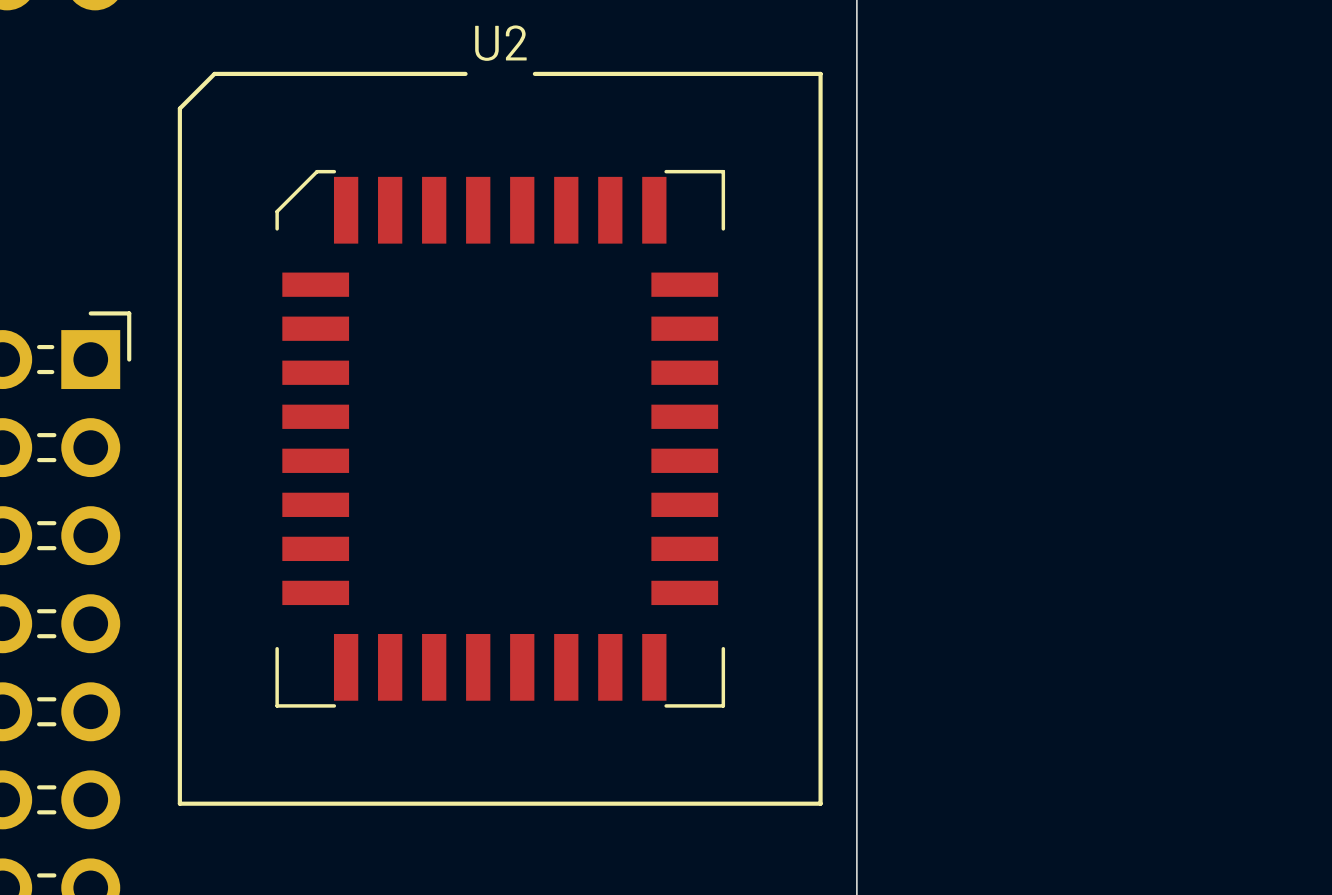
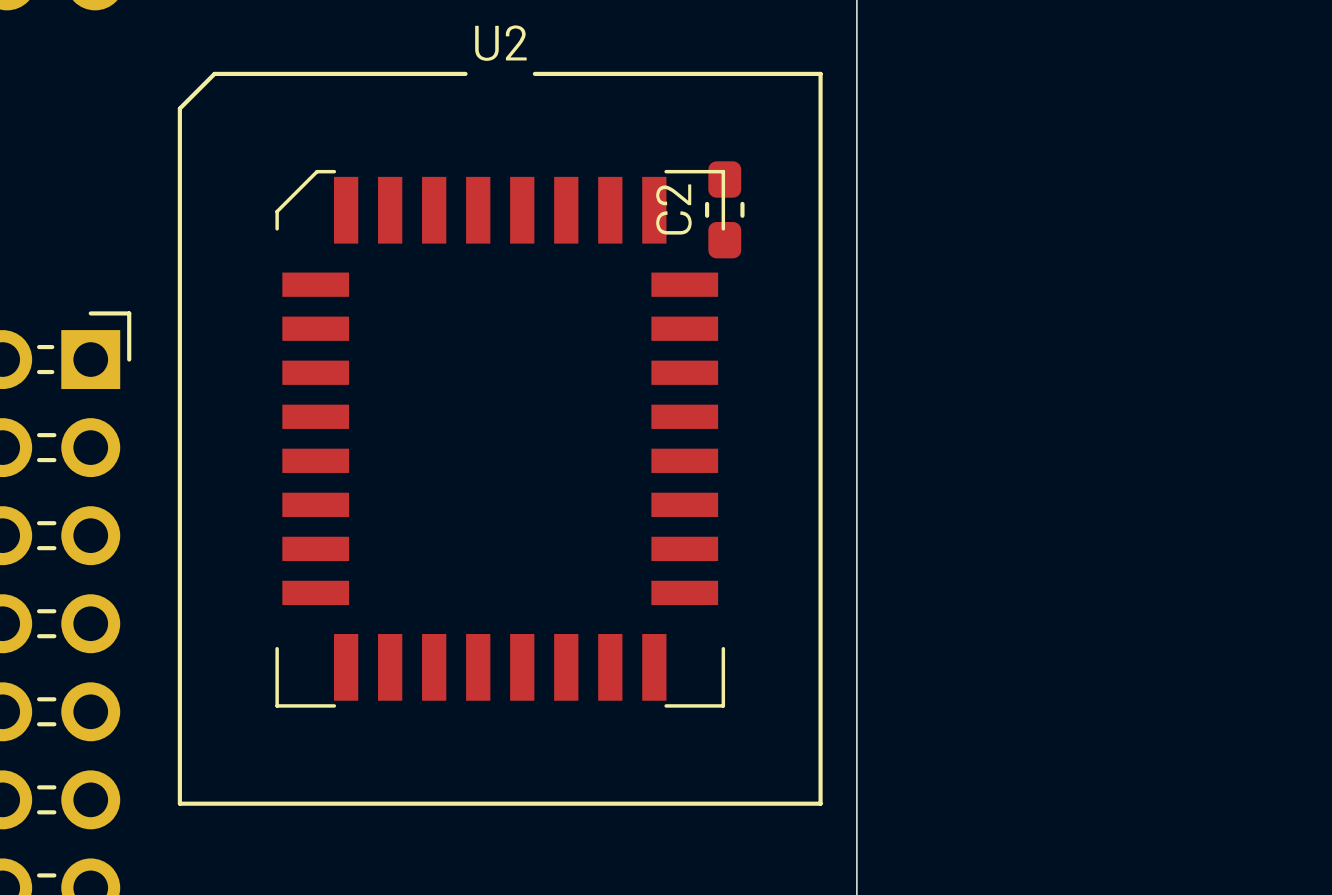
C2: none -> (724, 209)

